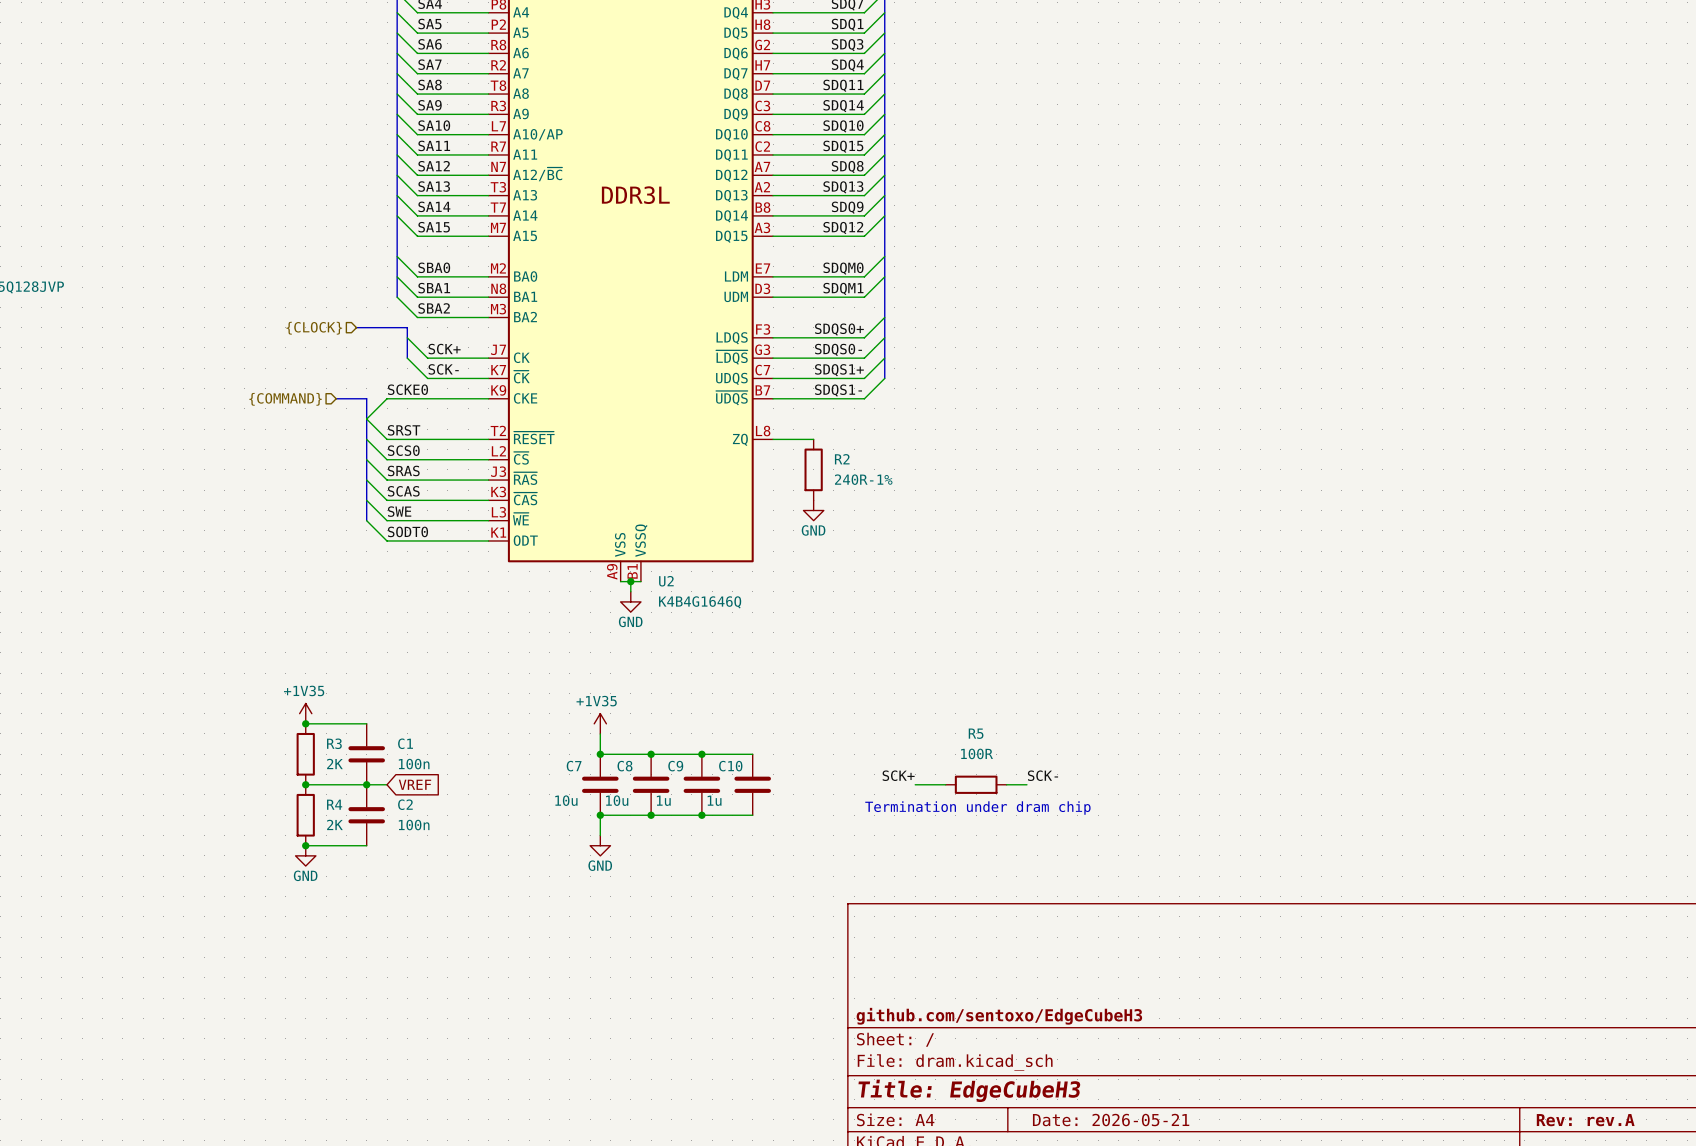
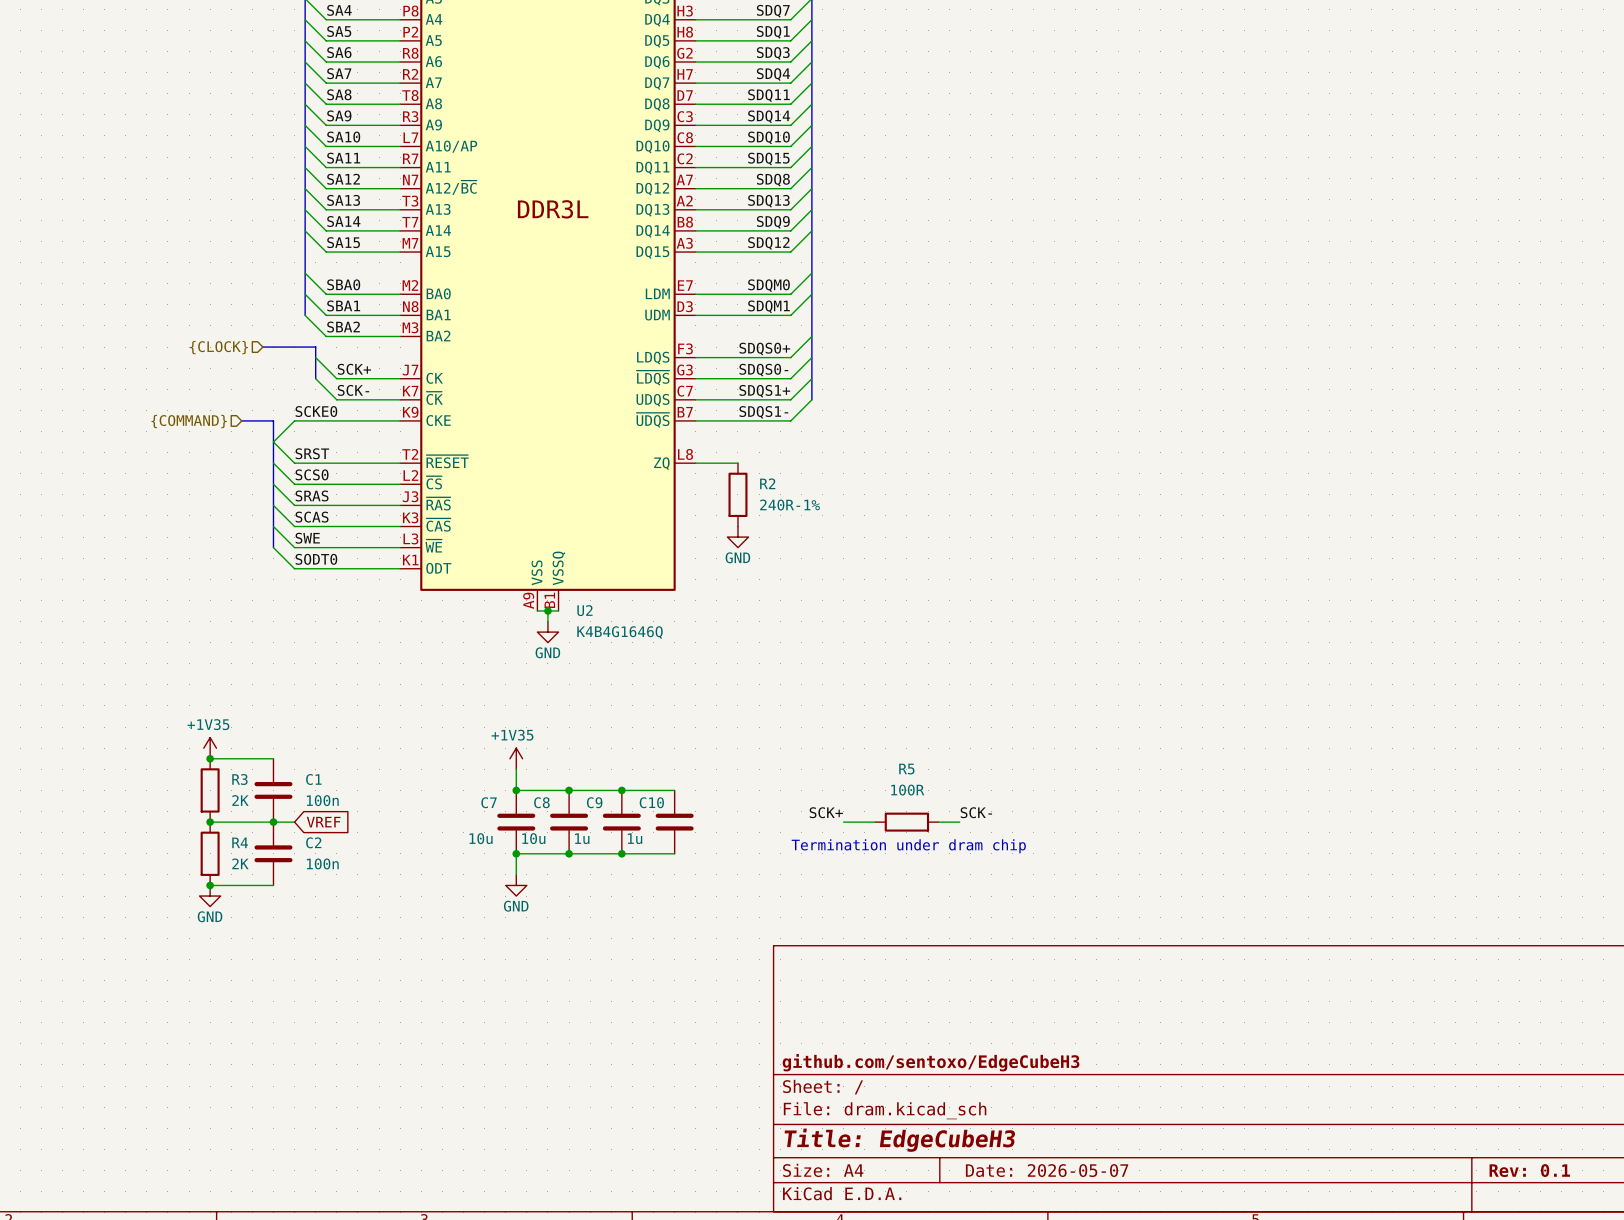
title block: Date: 2026-05-21 (1111, 1120) -> Date: 2026-05-07 (1047, 1170)
title block: Rev: rev.A (1585, 1120) -> Rev: 0.1 (1529, 1170)

